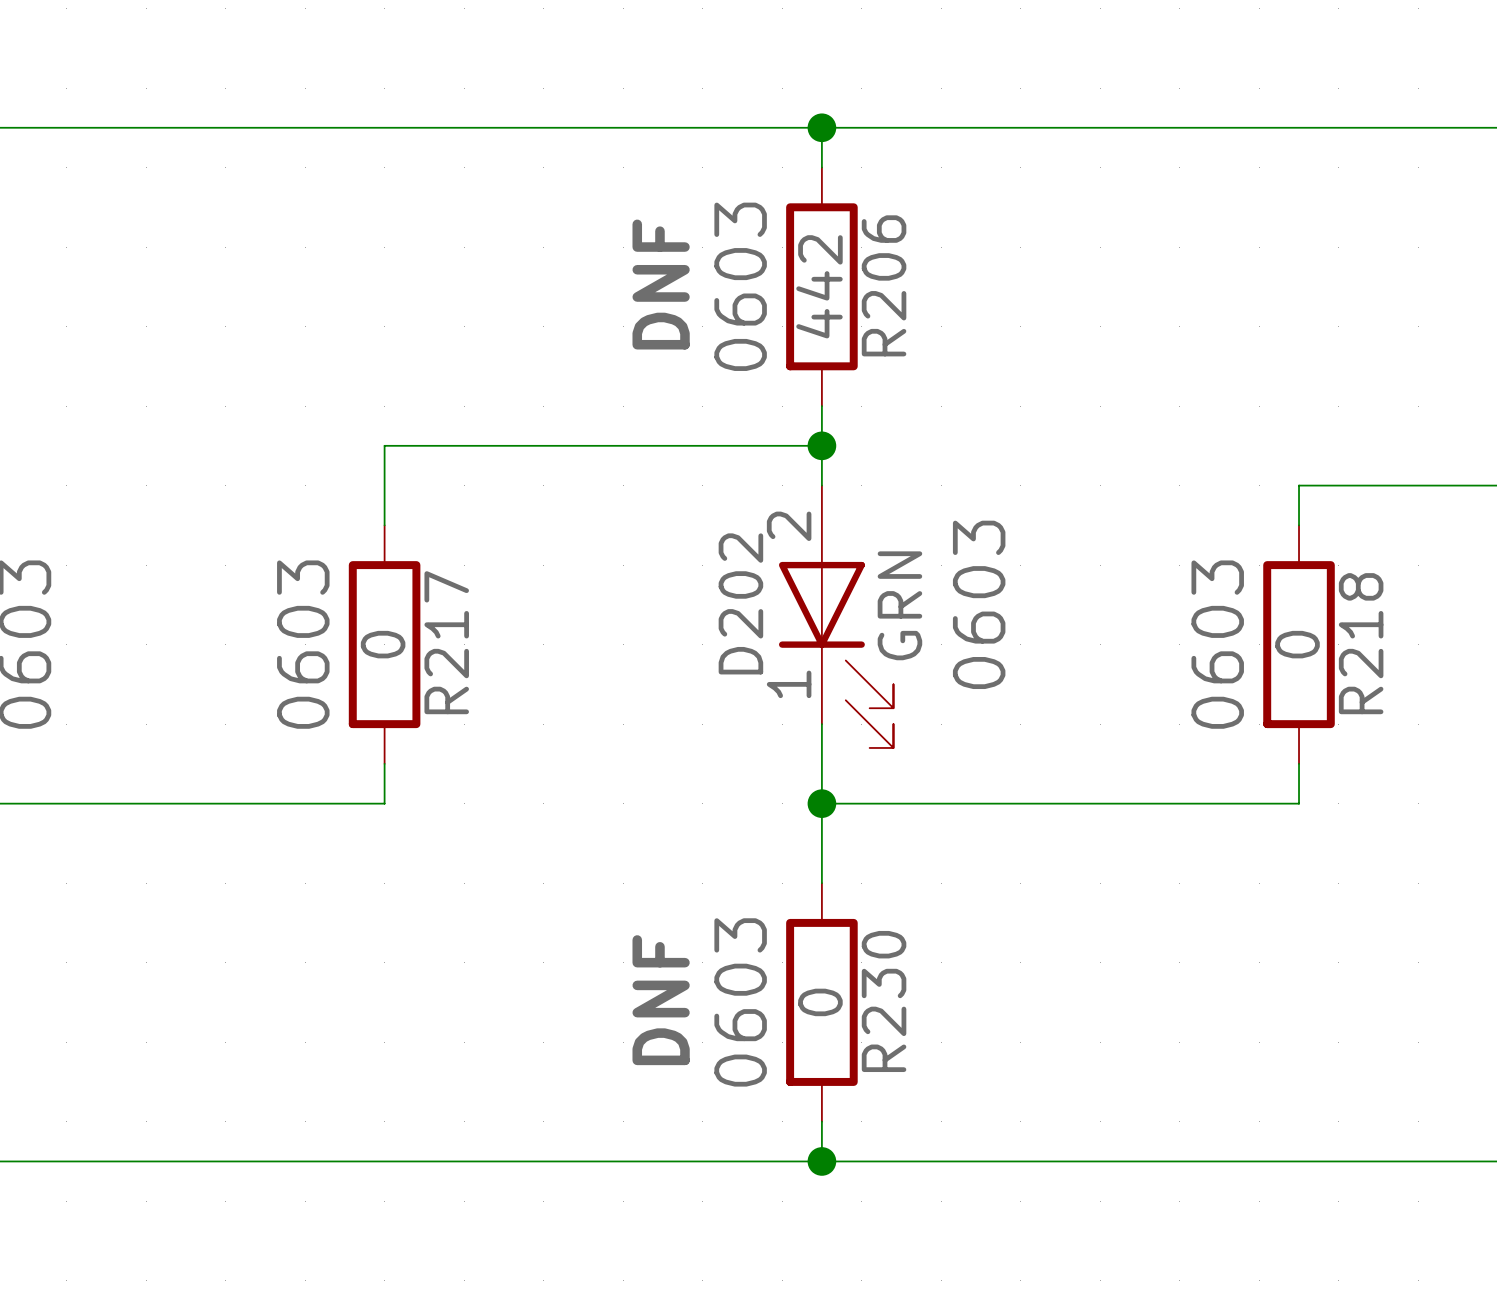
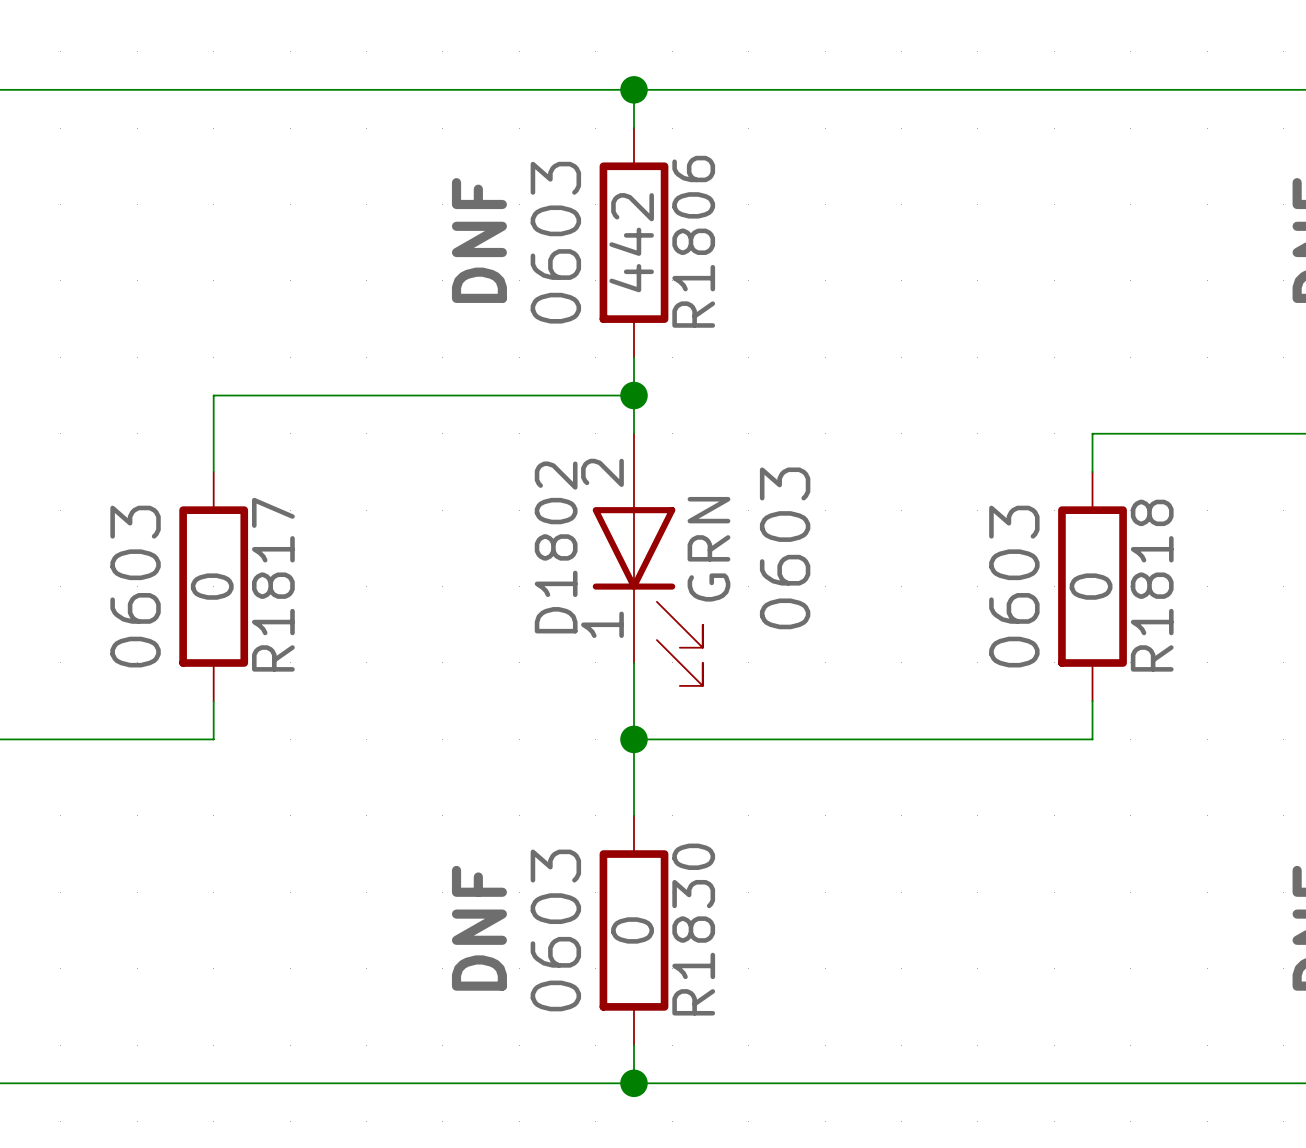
R206 name: R206 (884, 285) -> R1806 (693, 241)
D202 name: D202 (740, 603) -> D1802 (556, 547)
R217 name: R217 (446, 642) -> R1817 (273, 584)
R218 name: R218 (1361, 643) -> R1818 (1152, 585)
R230 name: R230 (884, 1001) -> R1830 (693, 929)

